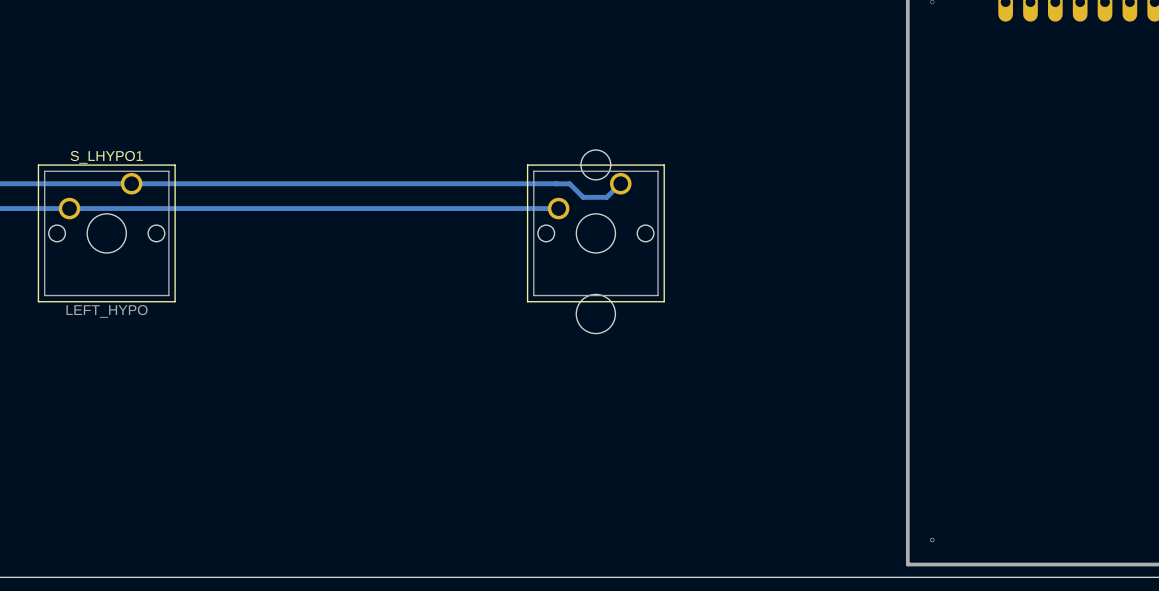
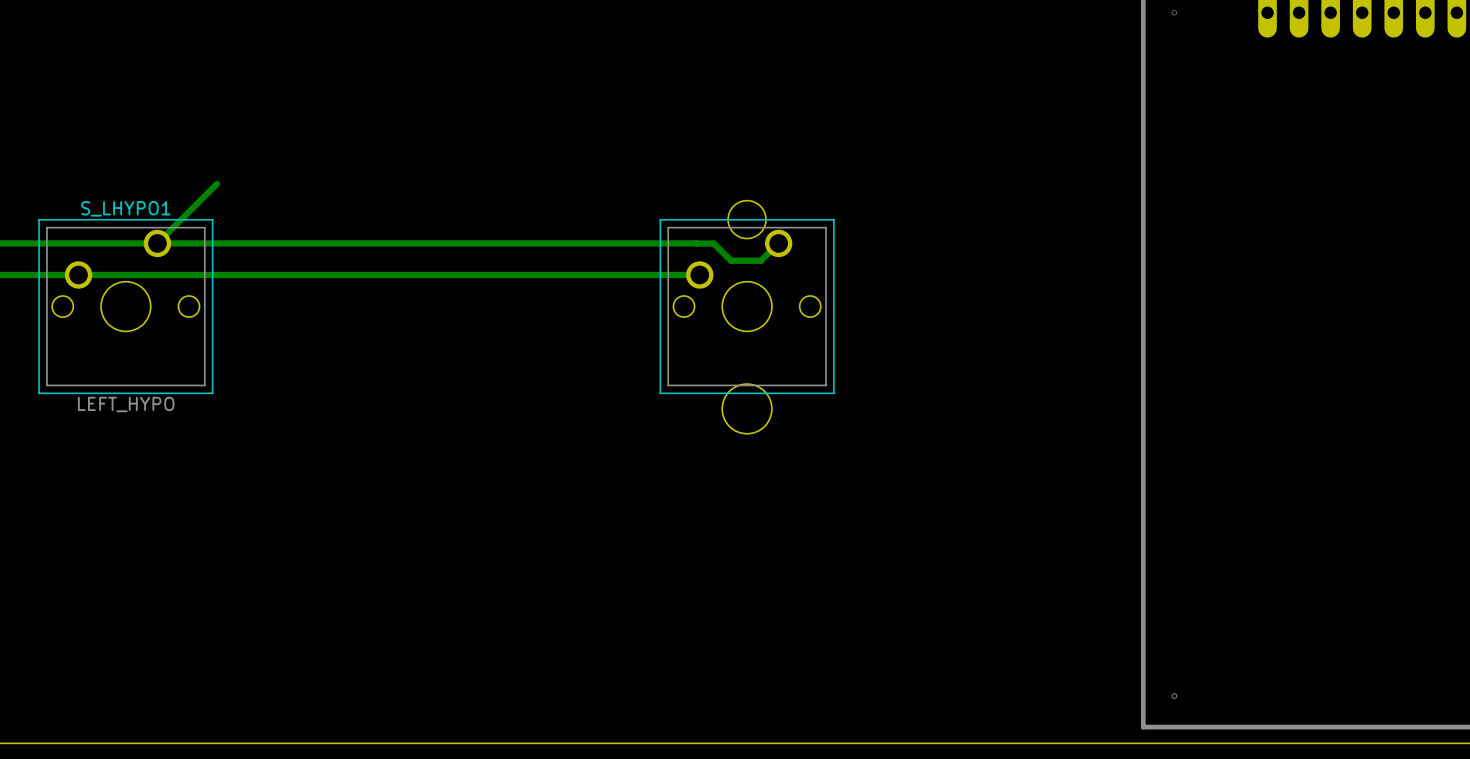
bottom track: none -> (216, 183) (157, 243)

